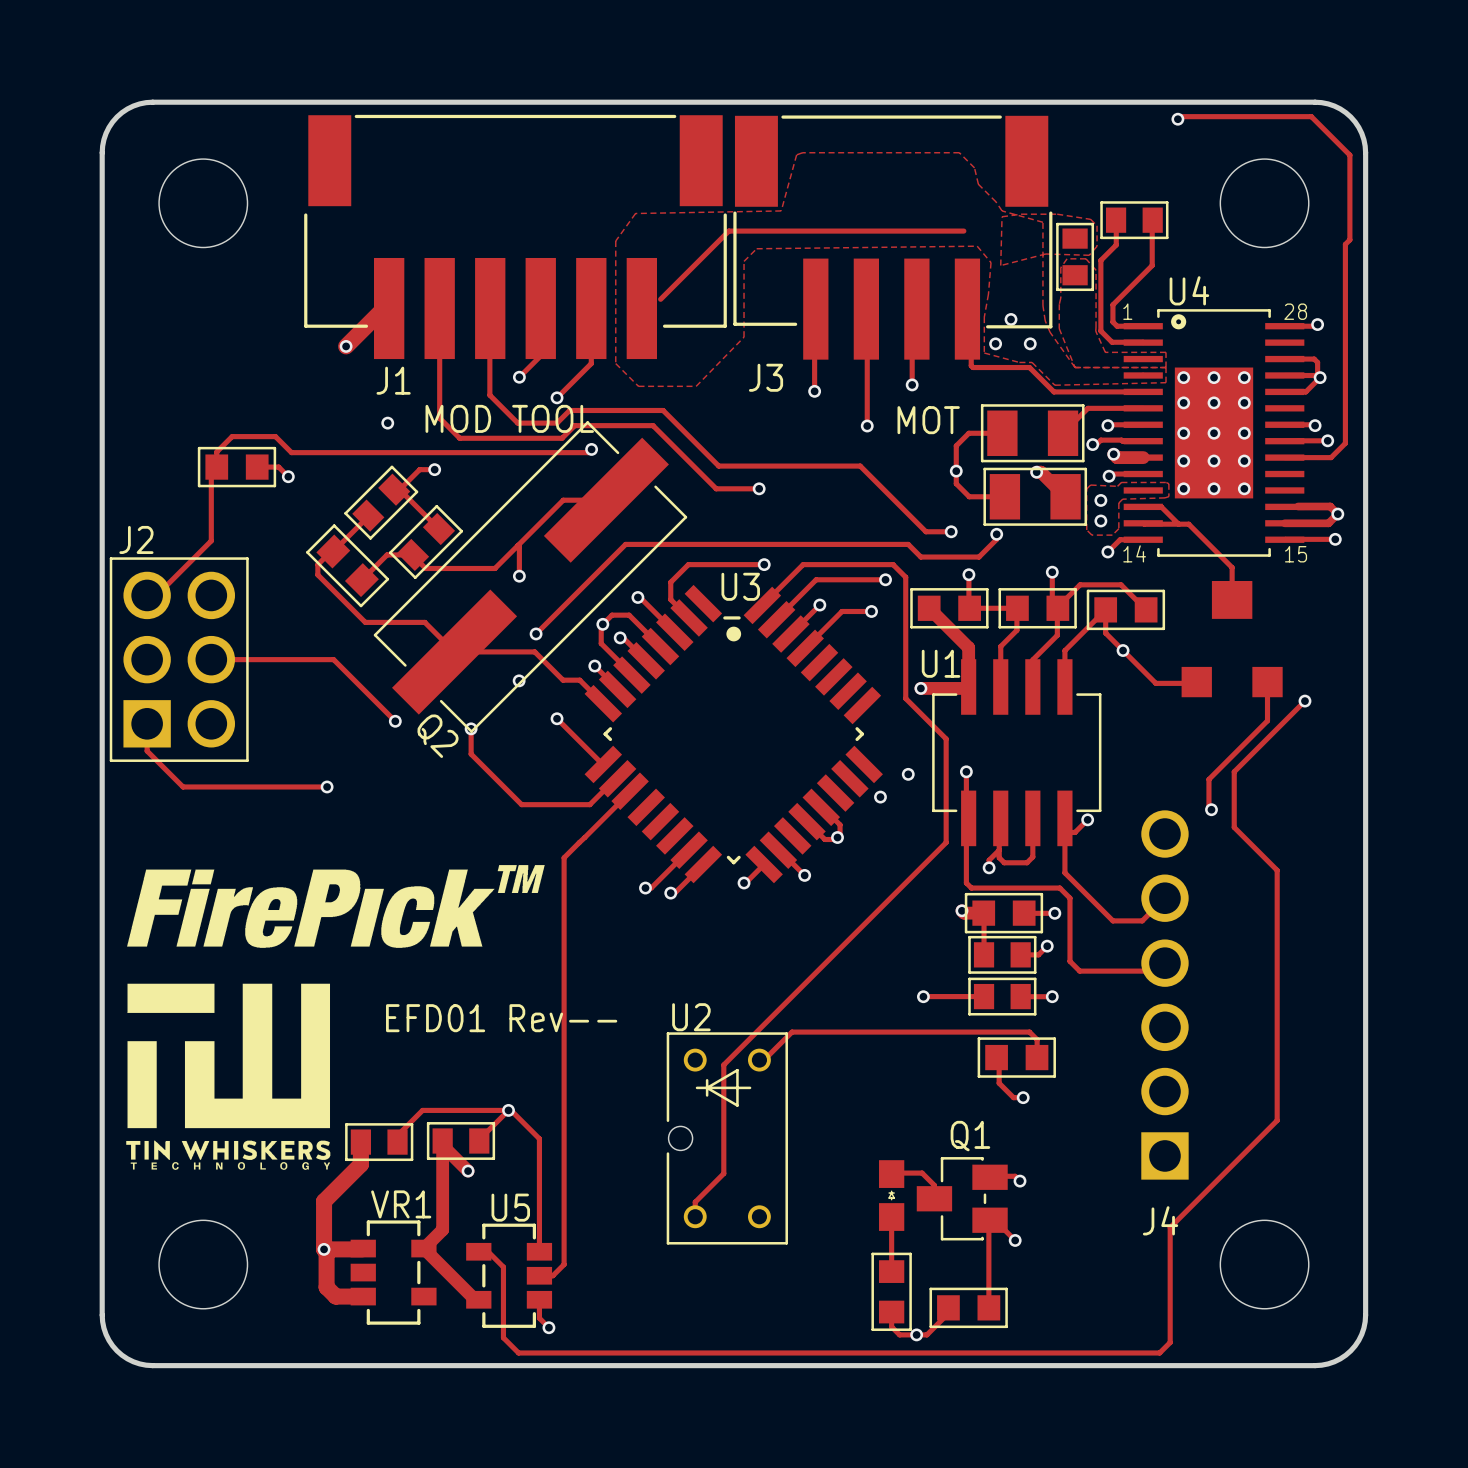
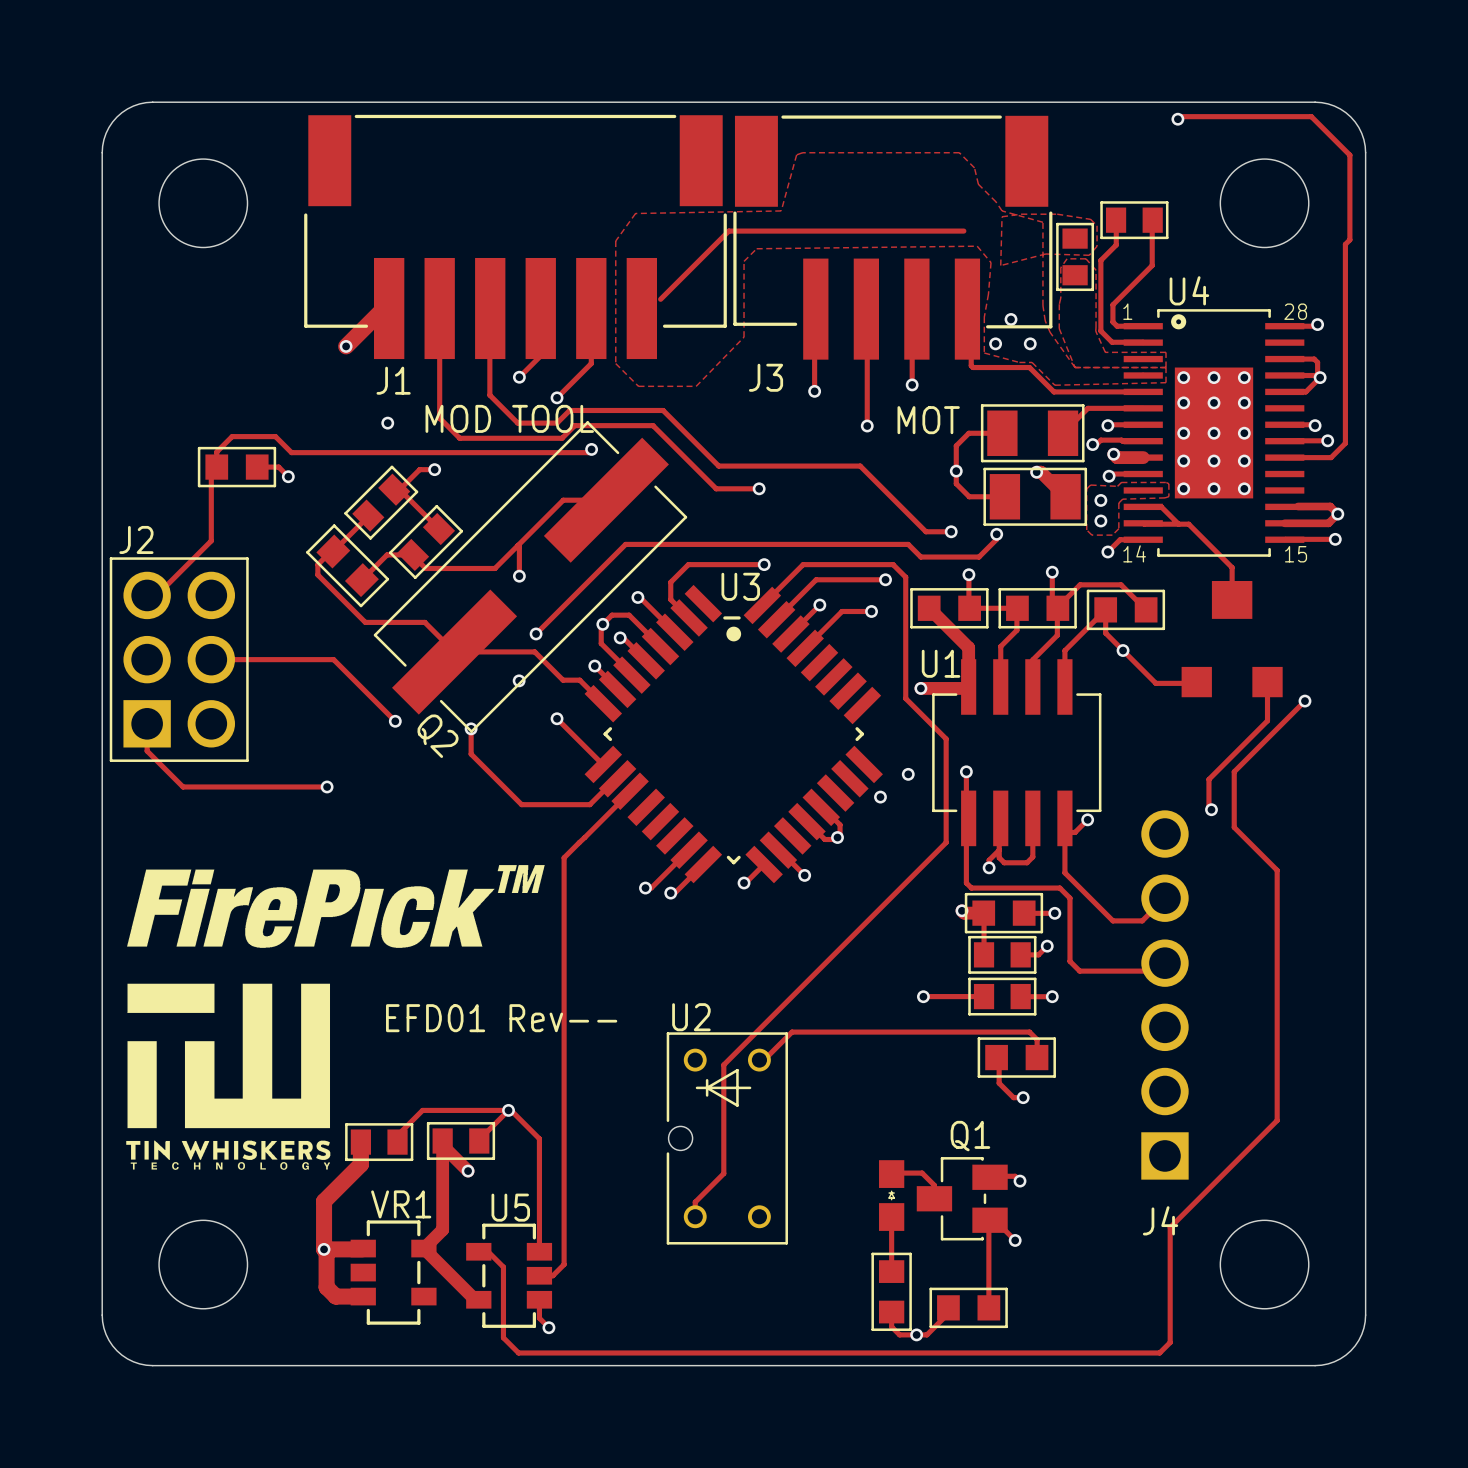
board edge width: thick (152, 102) (1315, 102) (1334, 106) (1350, 117) (1361, 133) (1365, 152) (1365, 1315) (1361, 1334) (1350, 1350) (1334, 1361) (1315, 1365) (152, 1365) (133, 1361) (117, 1350) (106, 1334) (102, 1315) (102, 152) (106, 133) (117, 117) (133, 106) (152, 102) -> thin (152, 102) (1315, 102) (1334, 106) (1350, 117) (1361, 133) (1365, 152) (1365, 1315) (1361, 1334) (1350, 1350) (1334, 1361) (1315, 1365) (152, 1365) (133, 1361) (117, 1350) (106, 1334) (102, 1315) (102, 152) (106, 133) (117, 117) (133, 106) (152, 102)

